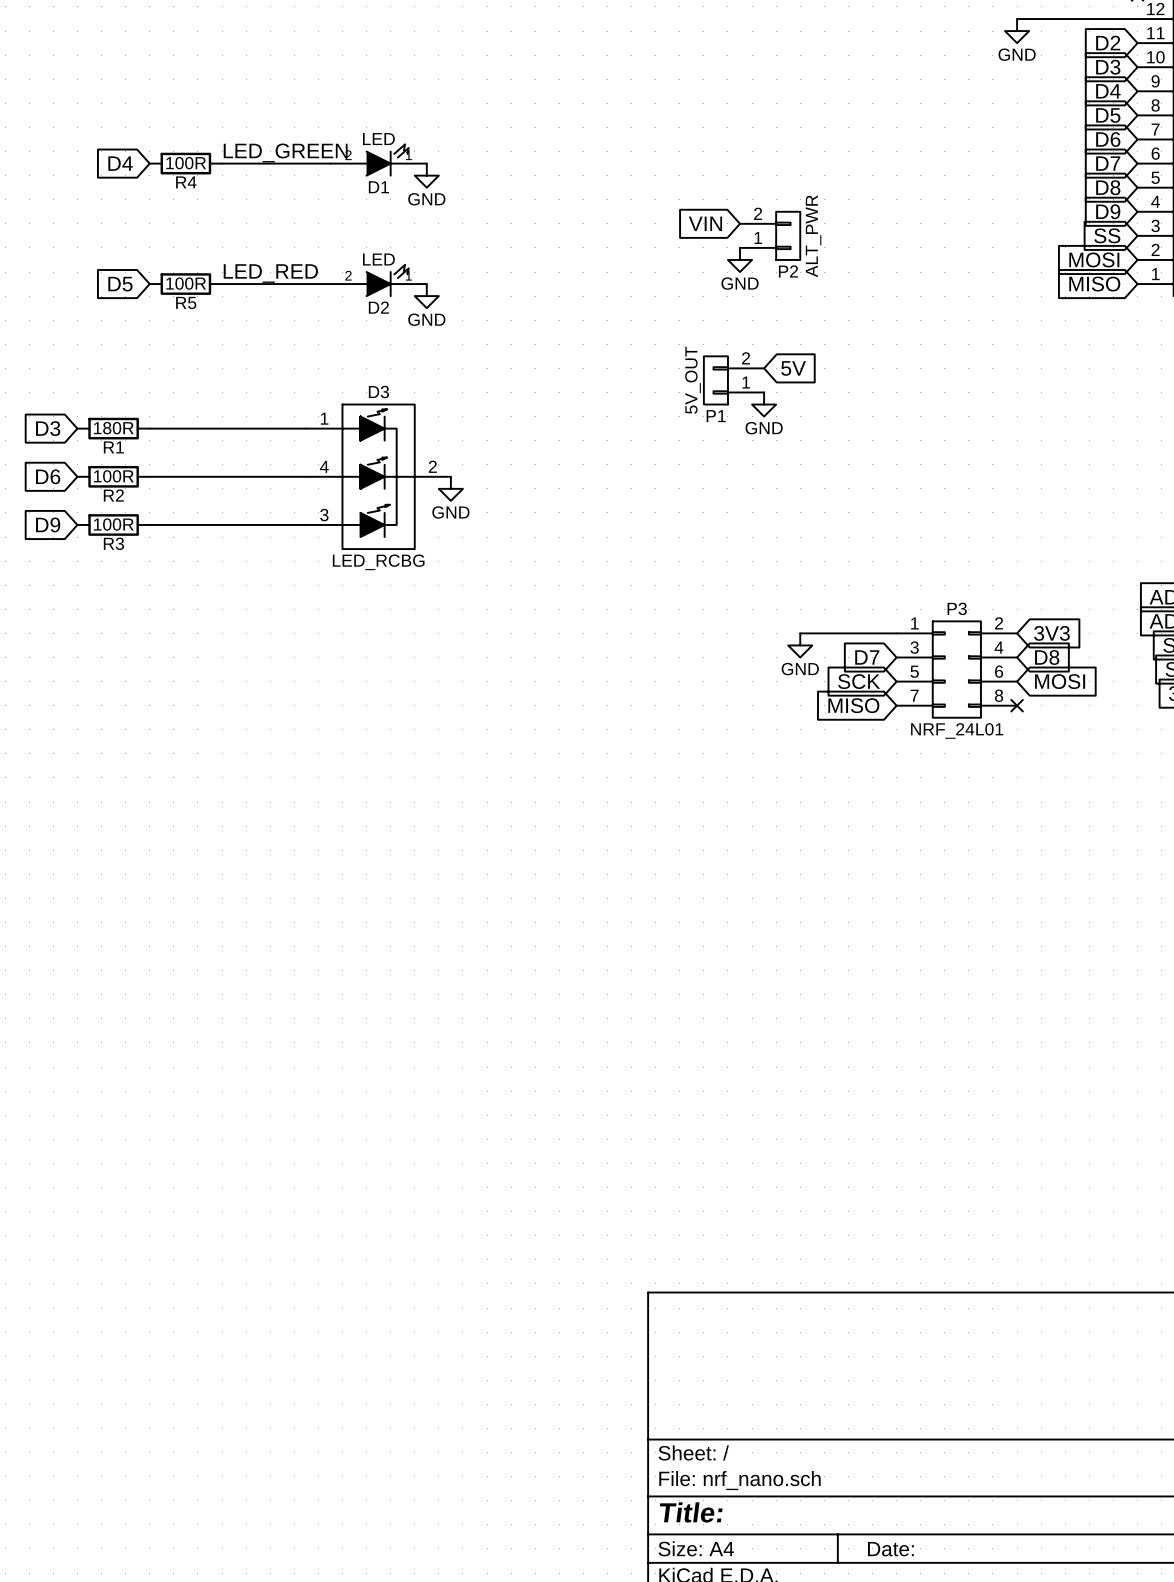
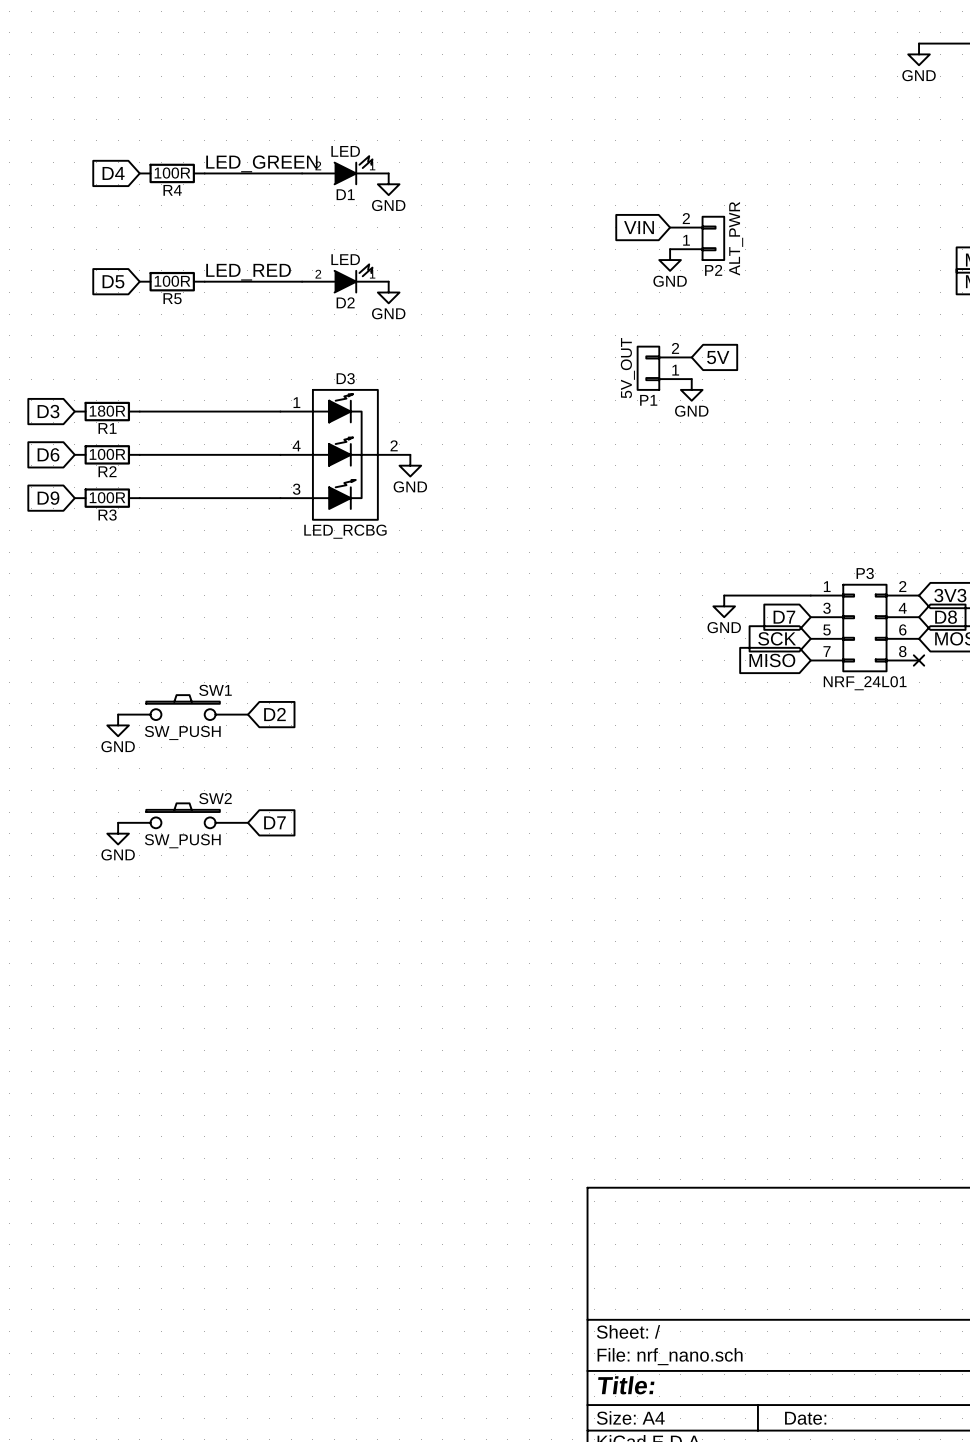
SW1: none -> SW_PUSH (183, 707)
global label: none -> D2 (274, 714)
power symbol: none -> GND (118, 725)
SW2: none -> SW_PUSH (183, 815)
global label: none -> D7 (274, 822)
power symbol: none -> GND (118, 833)

